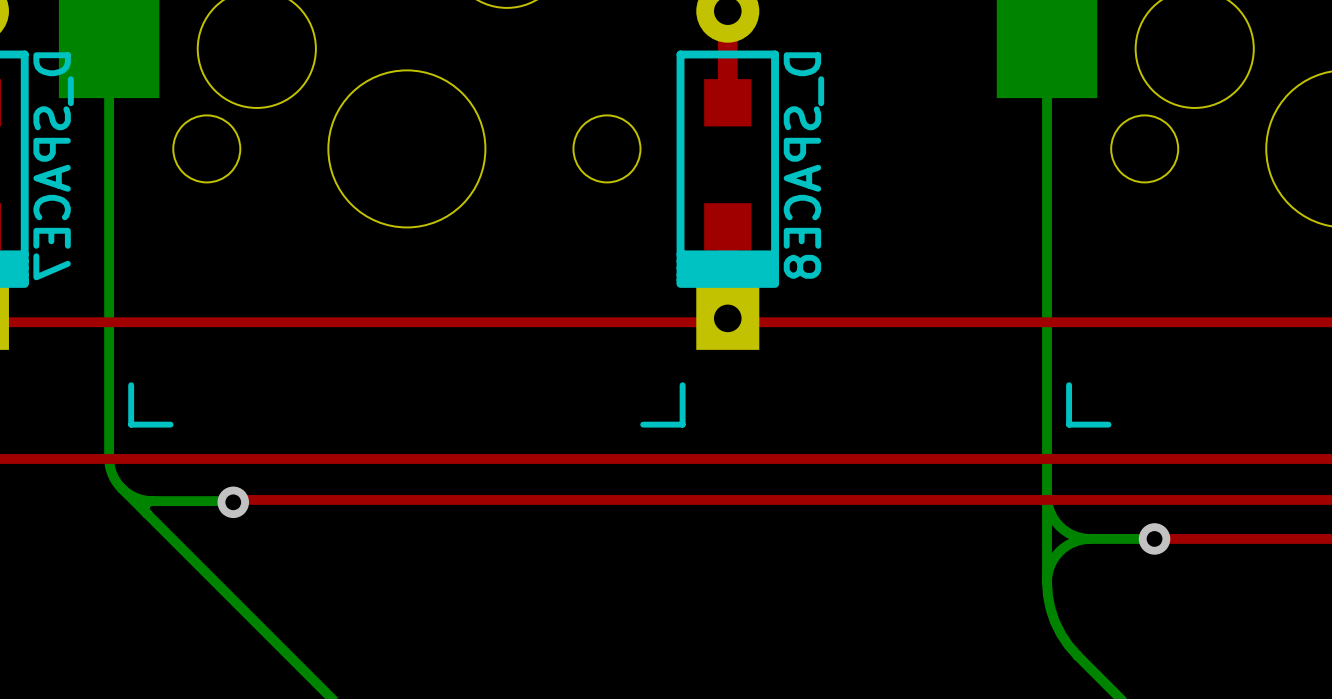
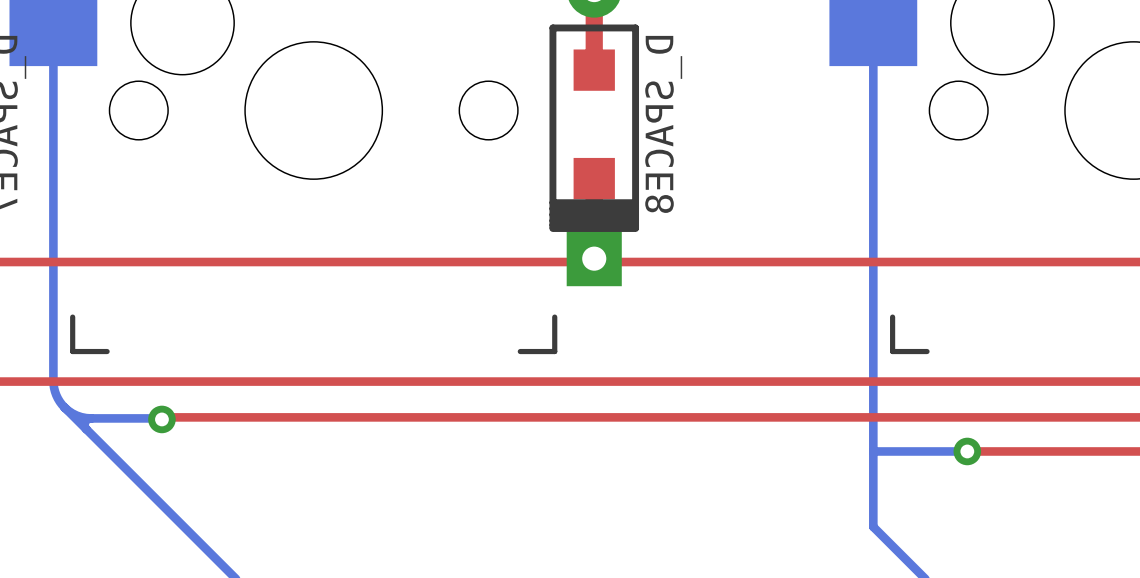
bottom track: (1047, 495) (1050, 512) (1059, 526) (1073, 535) (1090, 538) (1075, 541) (1063, 548) (1053, 559) (1047, 577) (1047, 595) (1054, 621) (1060, 634) (1077, 655) -> (873, 489) (873, 526) (899, 553)
bottom track: none -> (873, 451) (911, 451)

